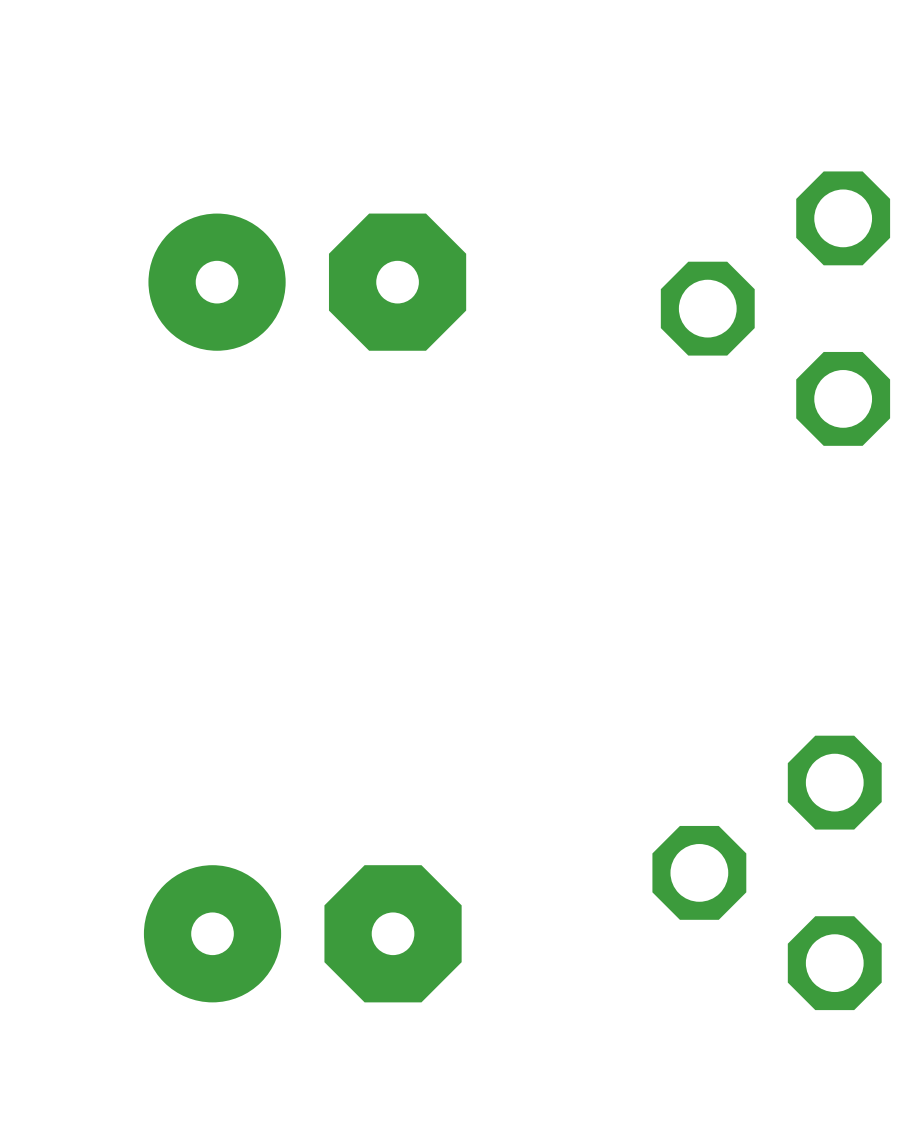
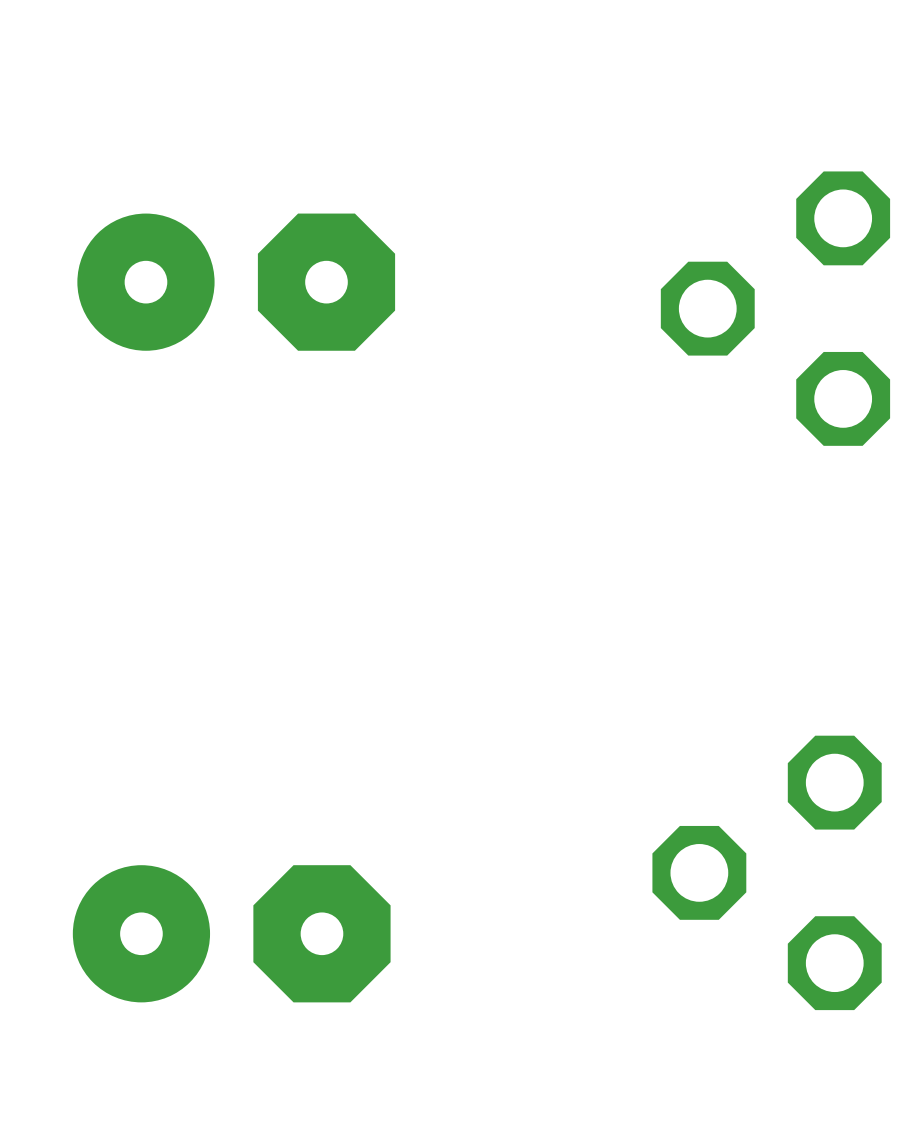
part position: (307, 282) -> (236, 282)
part position: (302, 933) -> (231, 933)

